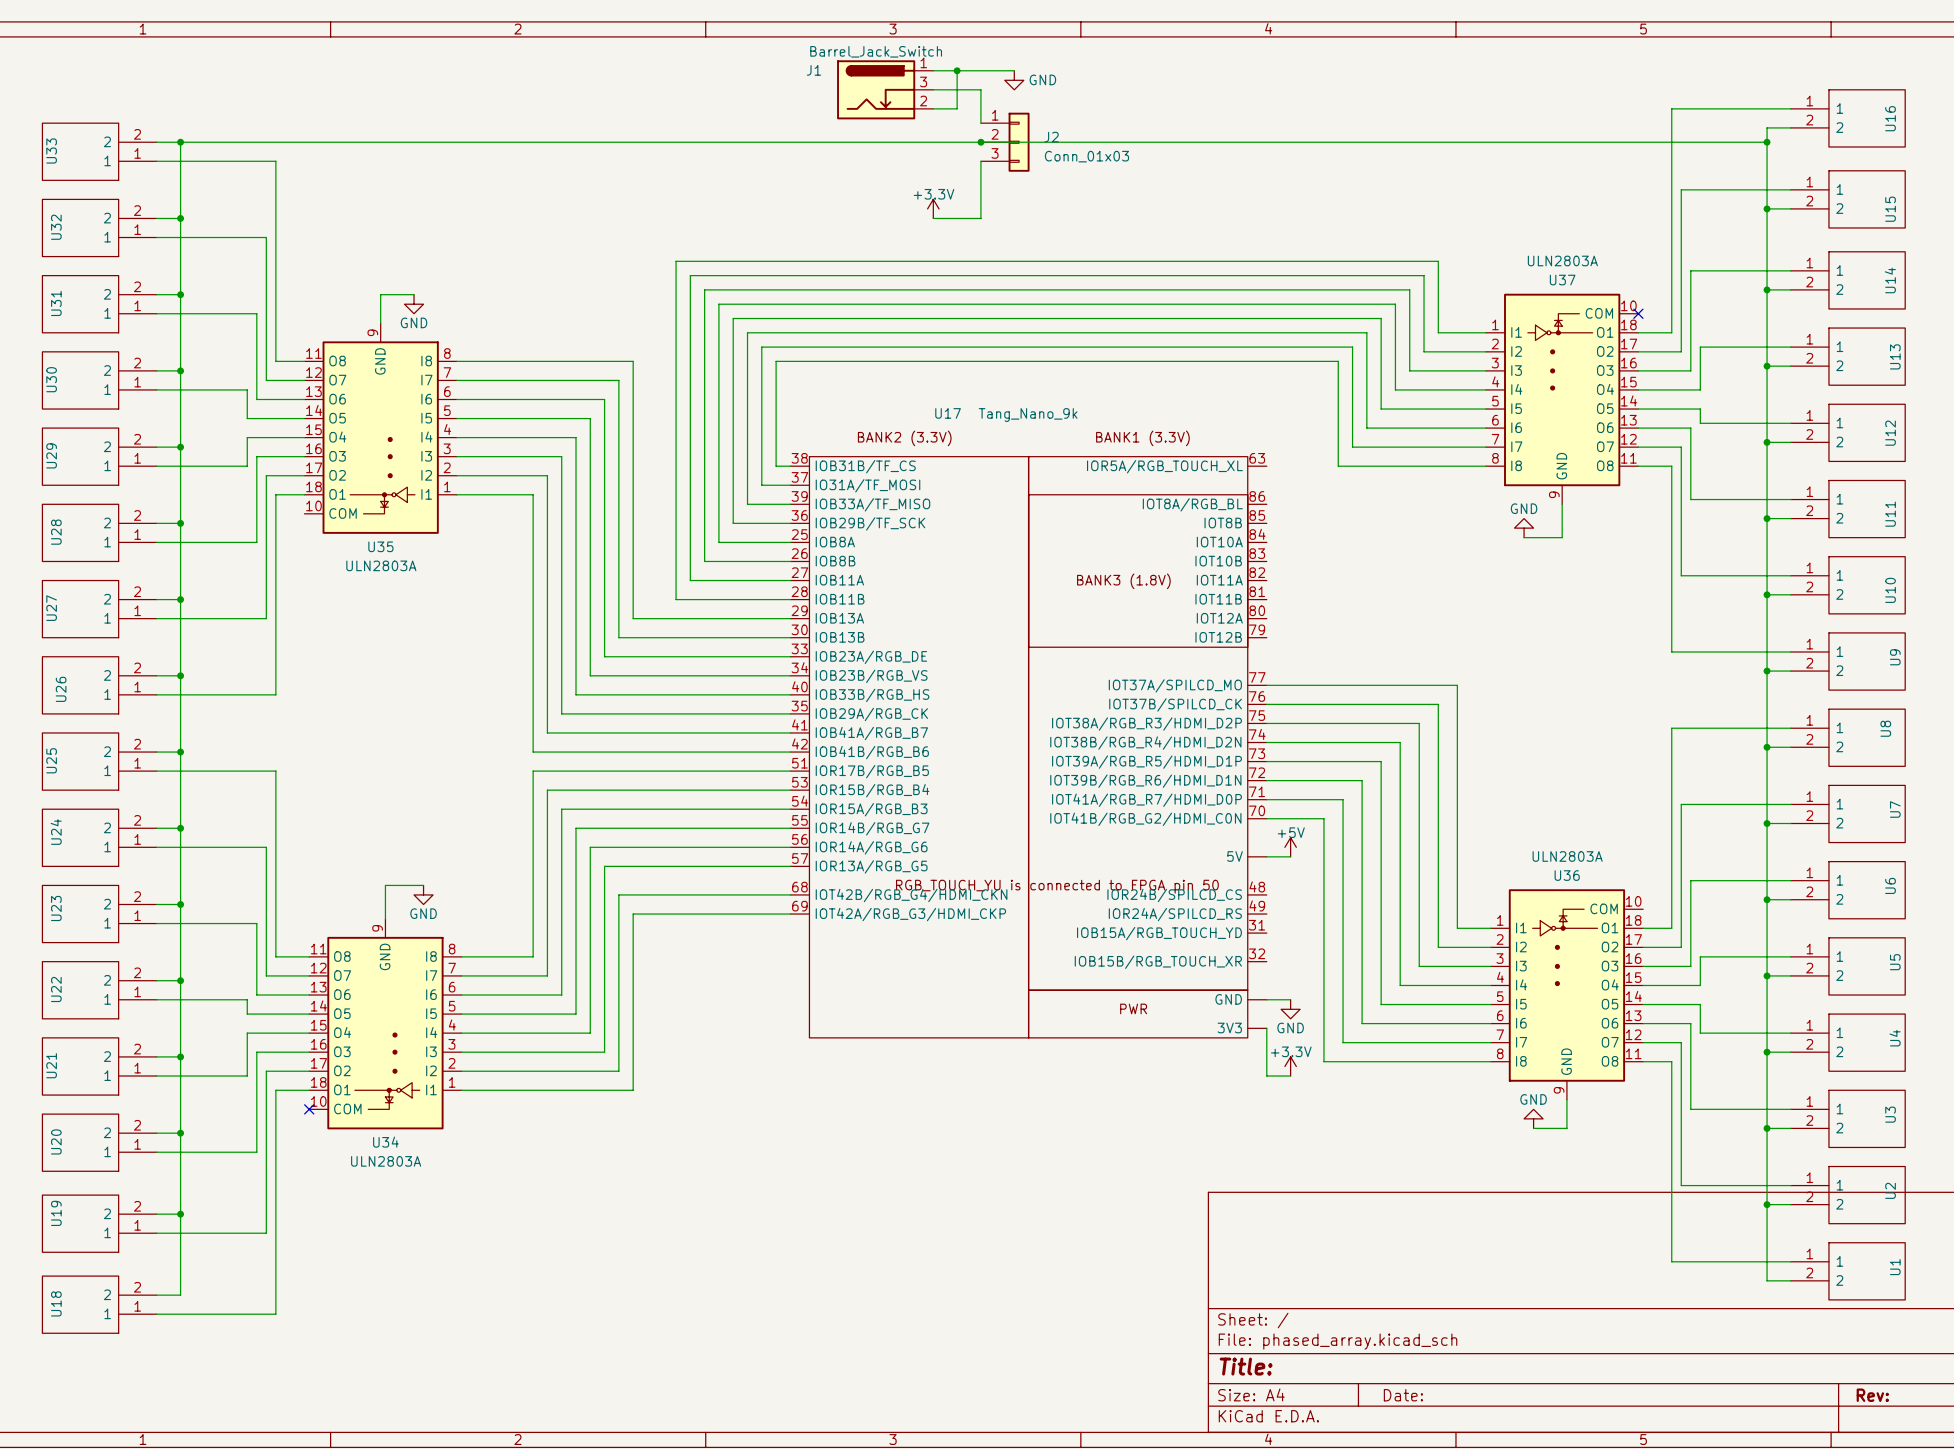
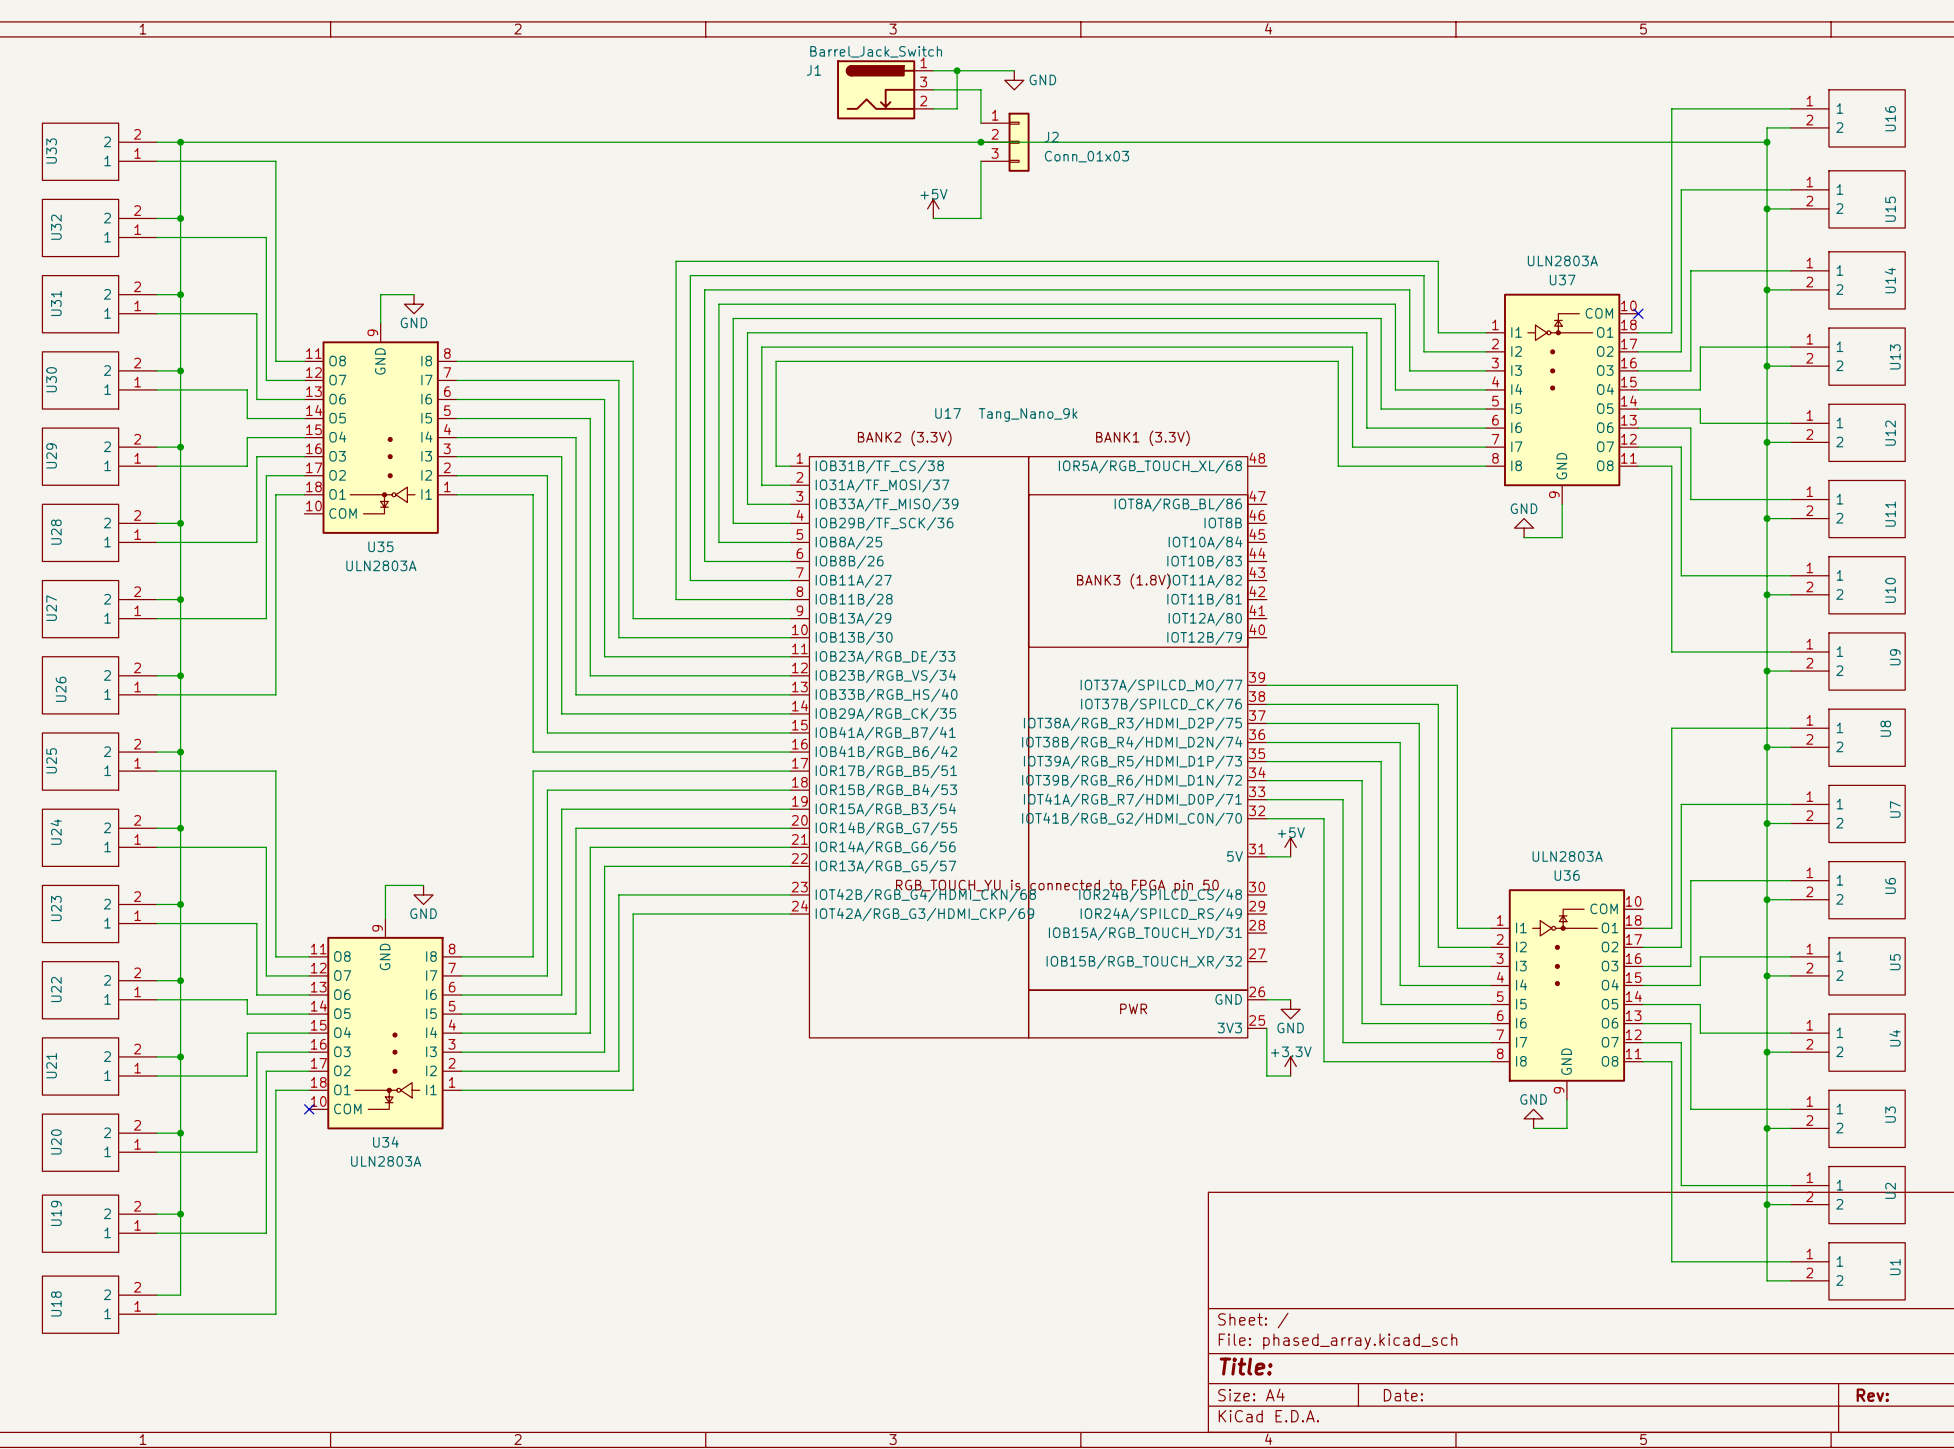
power symbol: +3.3V (933, 208) -> +5V (933, 208)
U17 symbol: [790, 456, 1353, 1038] -> [790, 456, 1353, 1038]

